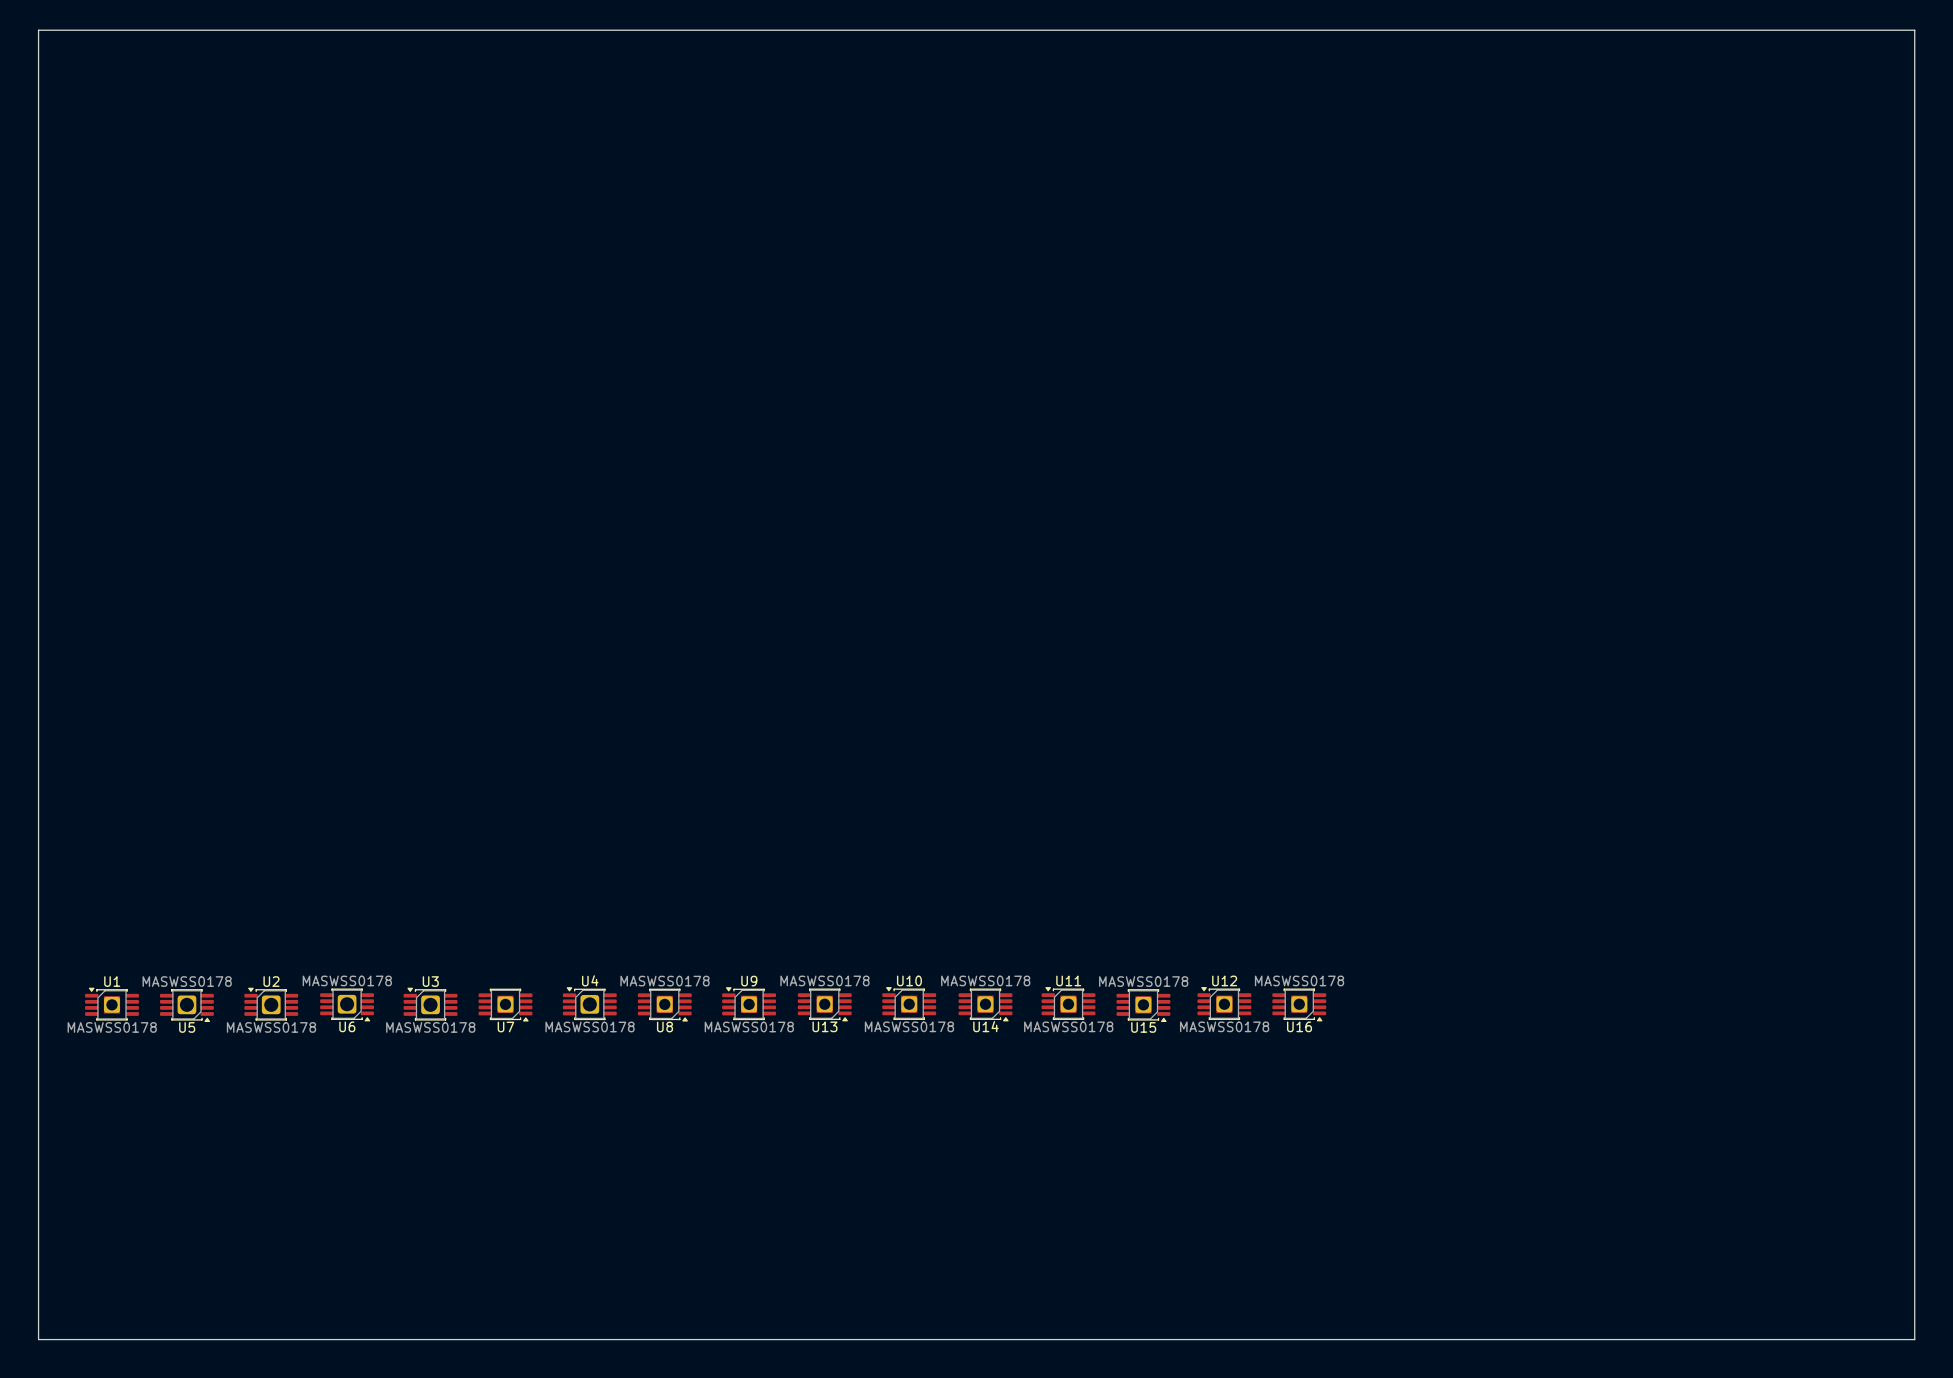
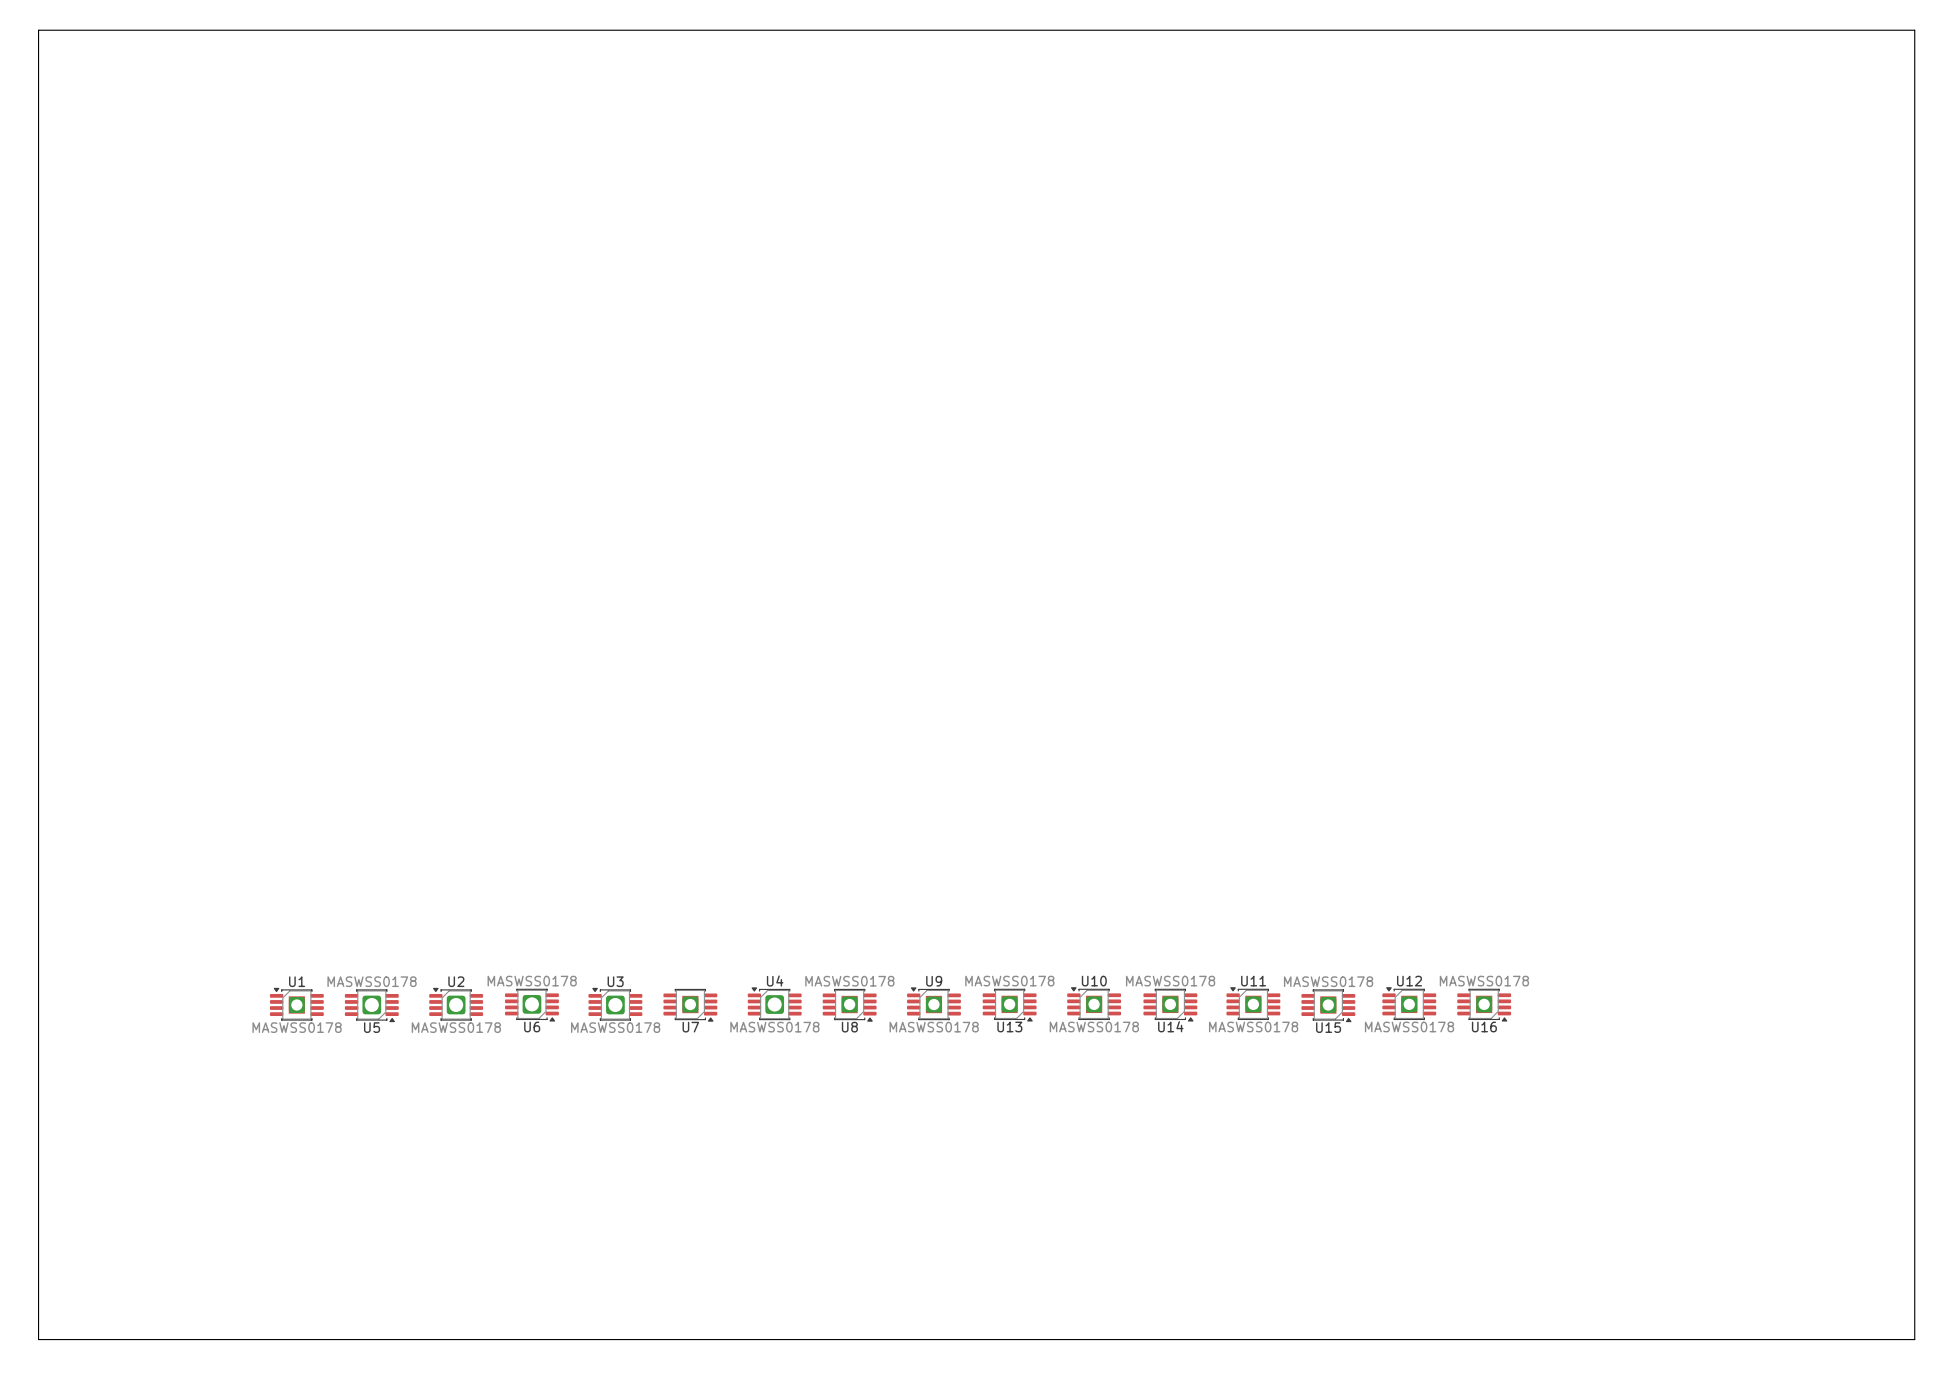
U4 position: (589, 1003) -> (774, 1003)
U9 position: (749, 1003) -> (933, 1003)
U10 position: (909, 1003) -> (1094, 1003)
U11 position: (1068, 1003) -> (1253, 1003)
U12 position: (1224, 1003) -> (1409, 1003)
U1 position: (111, 1004) -> (296, 1004)
U2 position: (271, 1004) -> (456, 1004)
U6 position: (347, 1004) -> (531, 1005)
U3 position: (430, 1004) -> (615, 1004)
U13 position: (824, 1004) -> (1009, 1005)
U14 position: (985, 1004) -> (1170, 1005)
U16 position: (1299, 1004) -> (1484, 1005)
U5 position: (186, 1005) -> (371, 1005)
U7 position: (505, 1005) -> (690, 1005)
U8 position: (664, 1005) -> (849, 1005)
U15 position: (1143, 1005) -> (1328, 1005)

